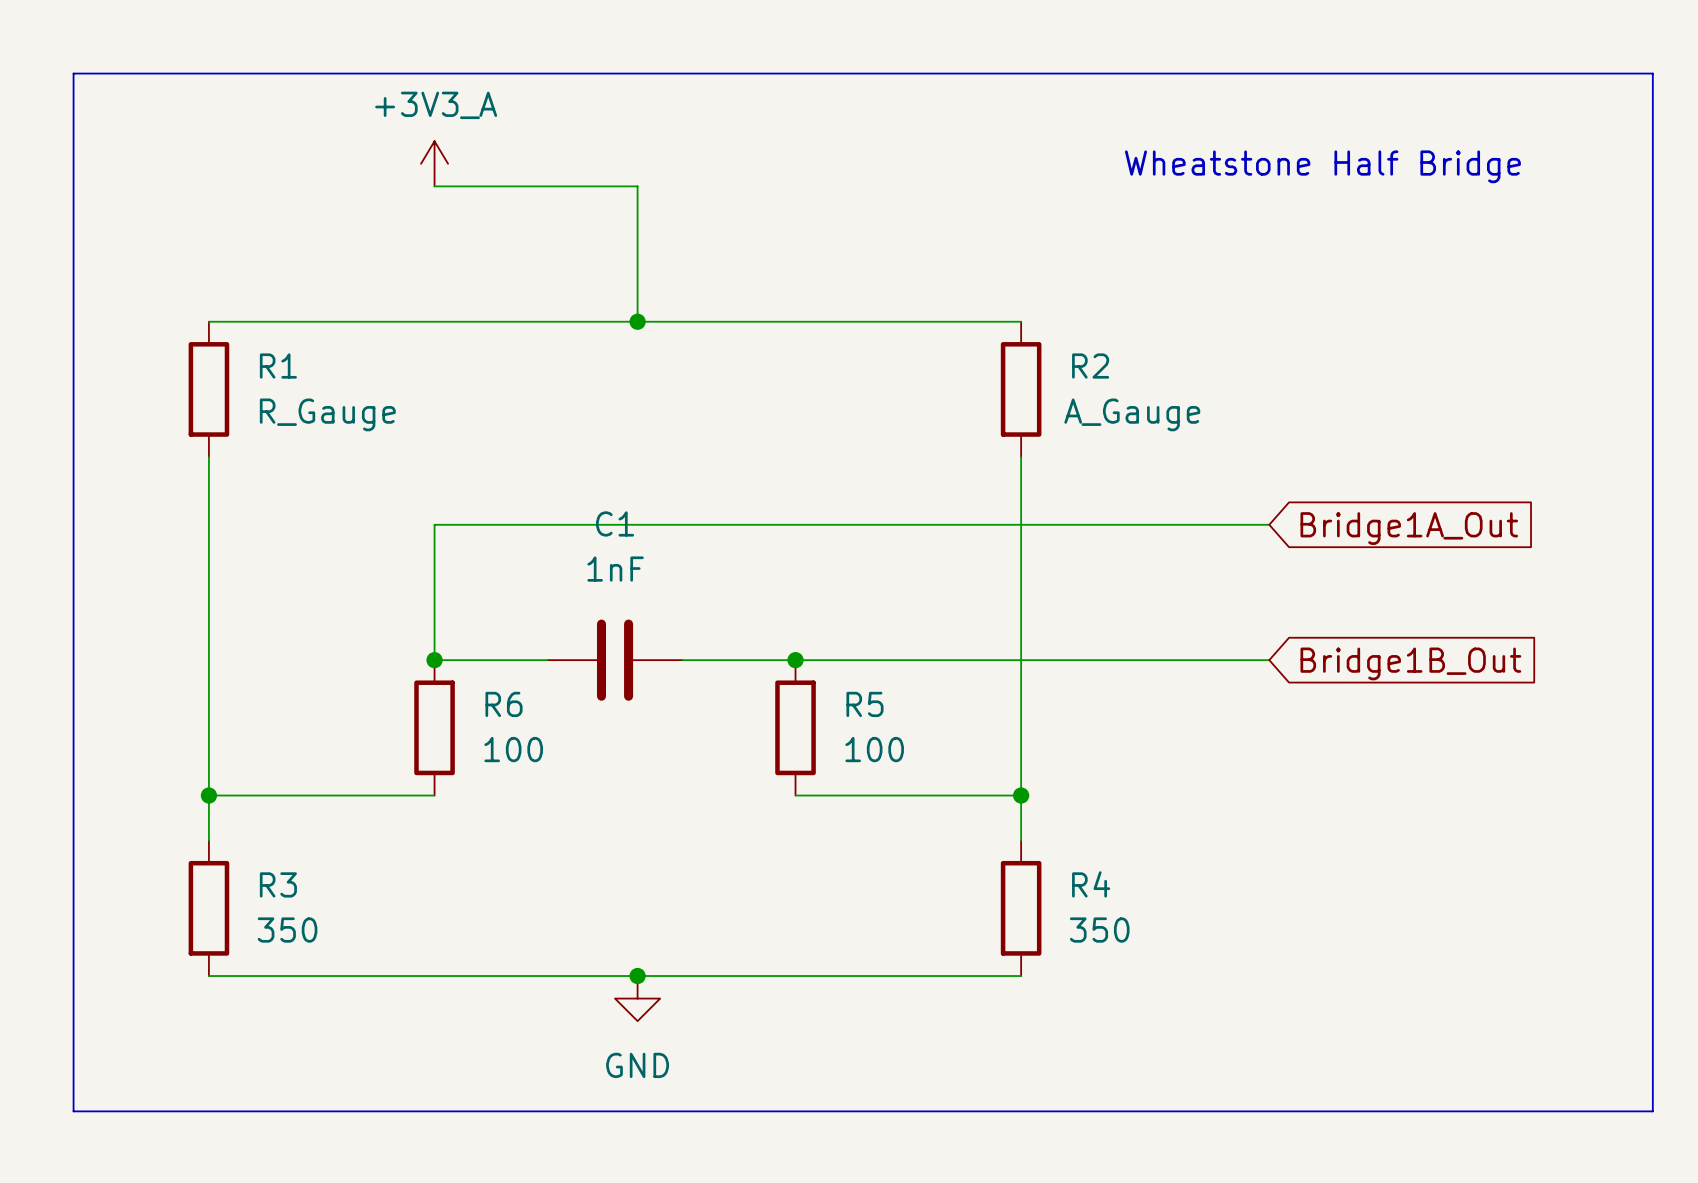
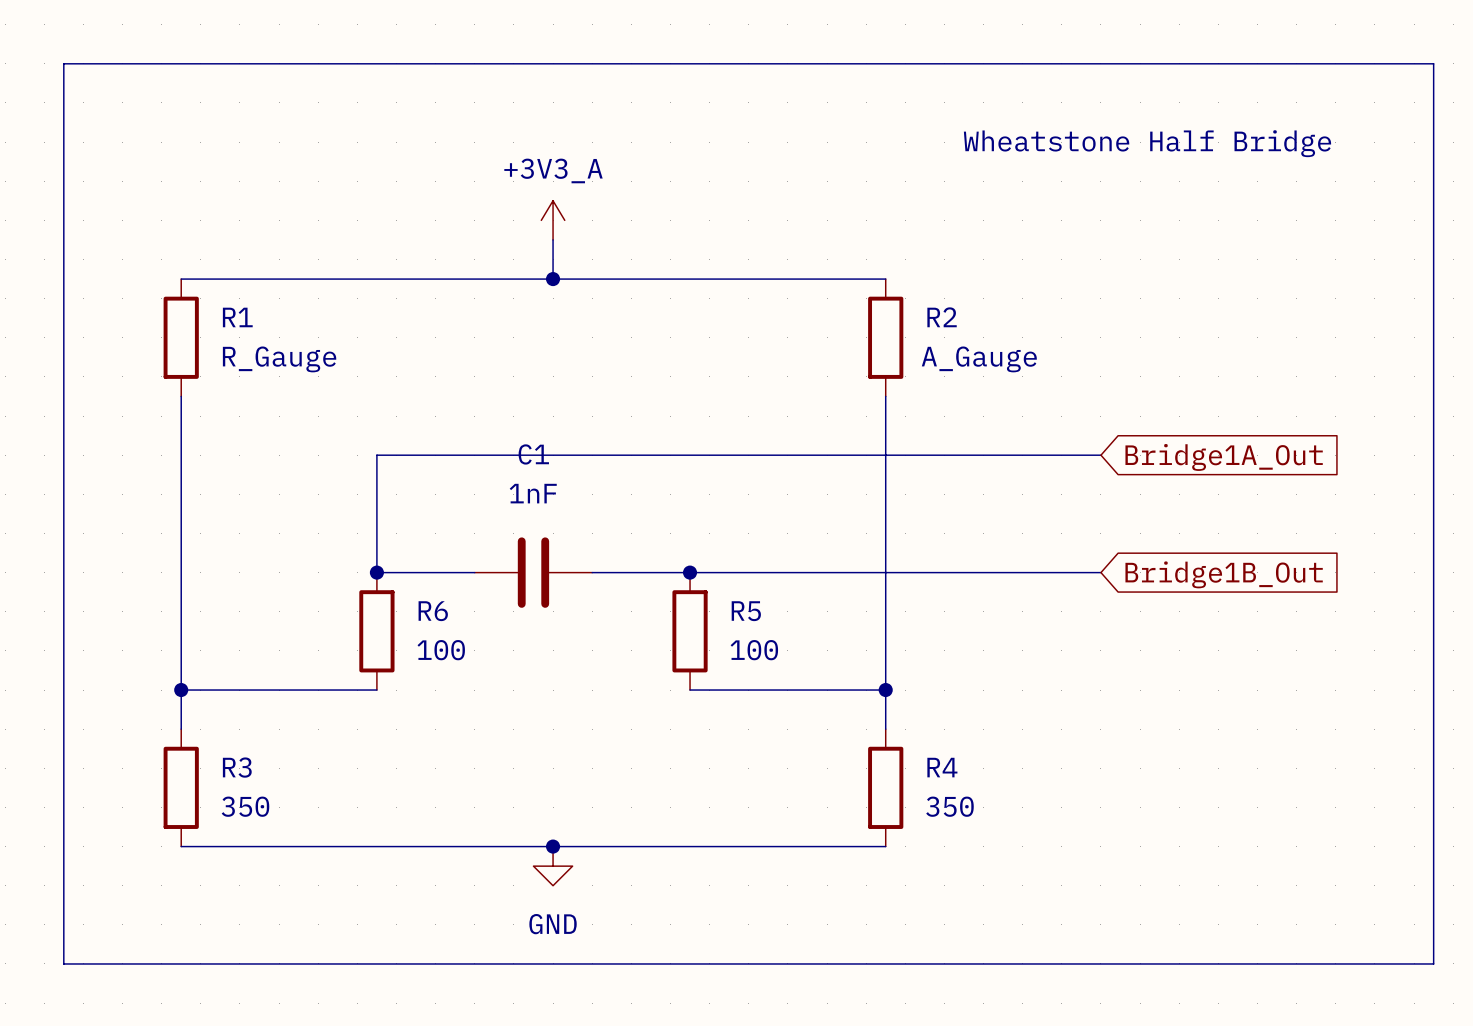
power symbol position: +3V3_A (434, 163) -> +3V3_A (553, 220)
wire: (434, 186) (637, 186) (637, 276) -> none

